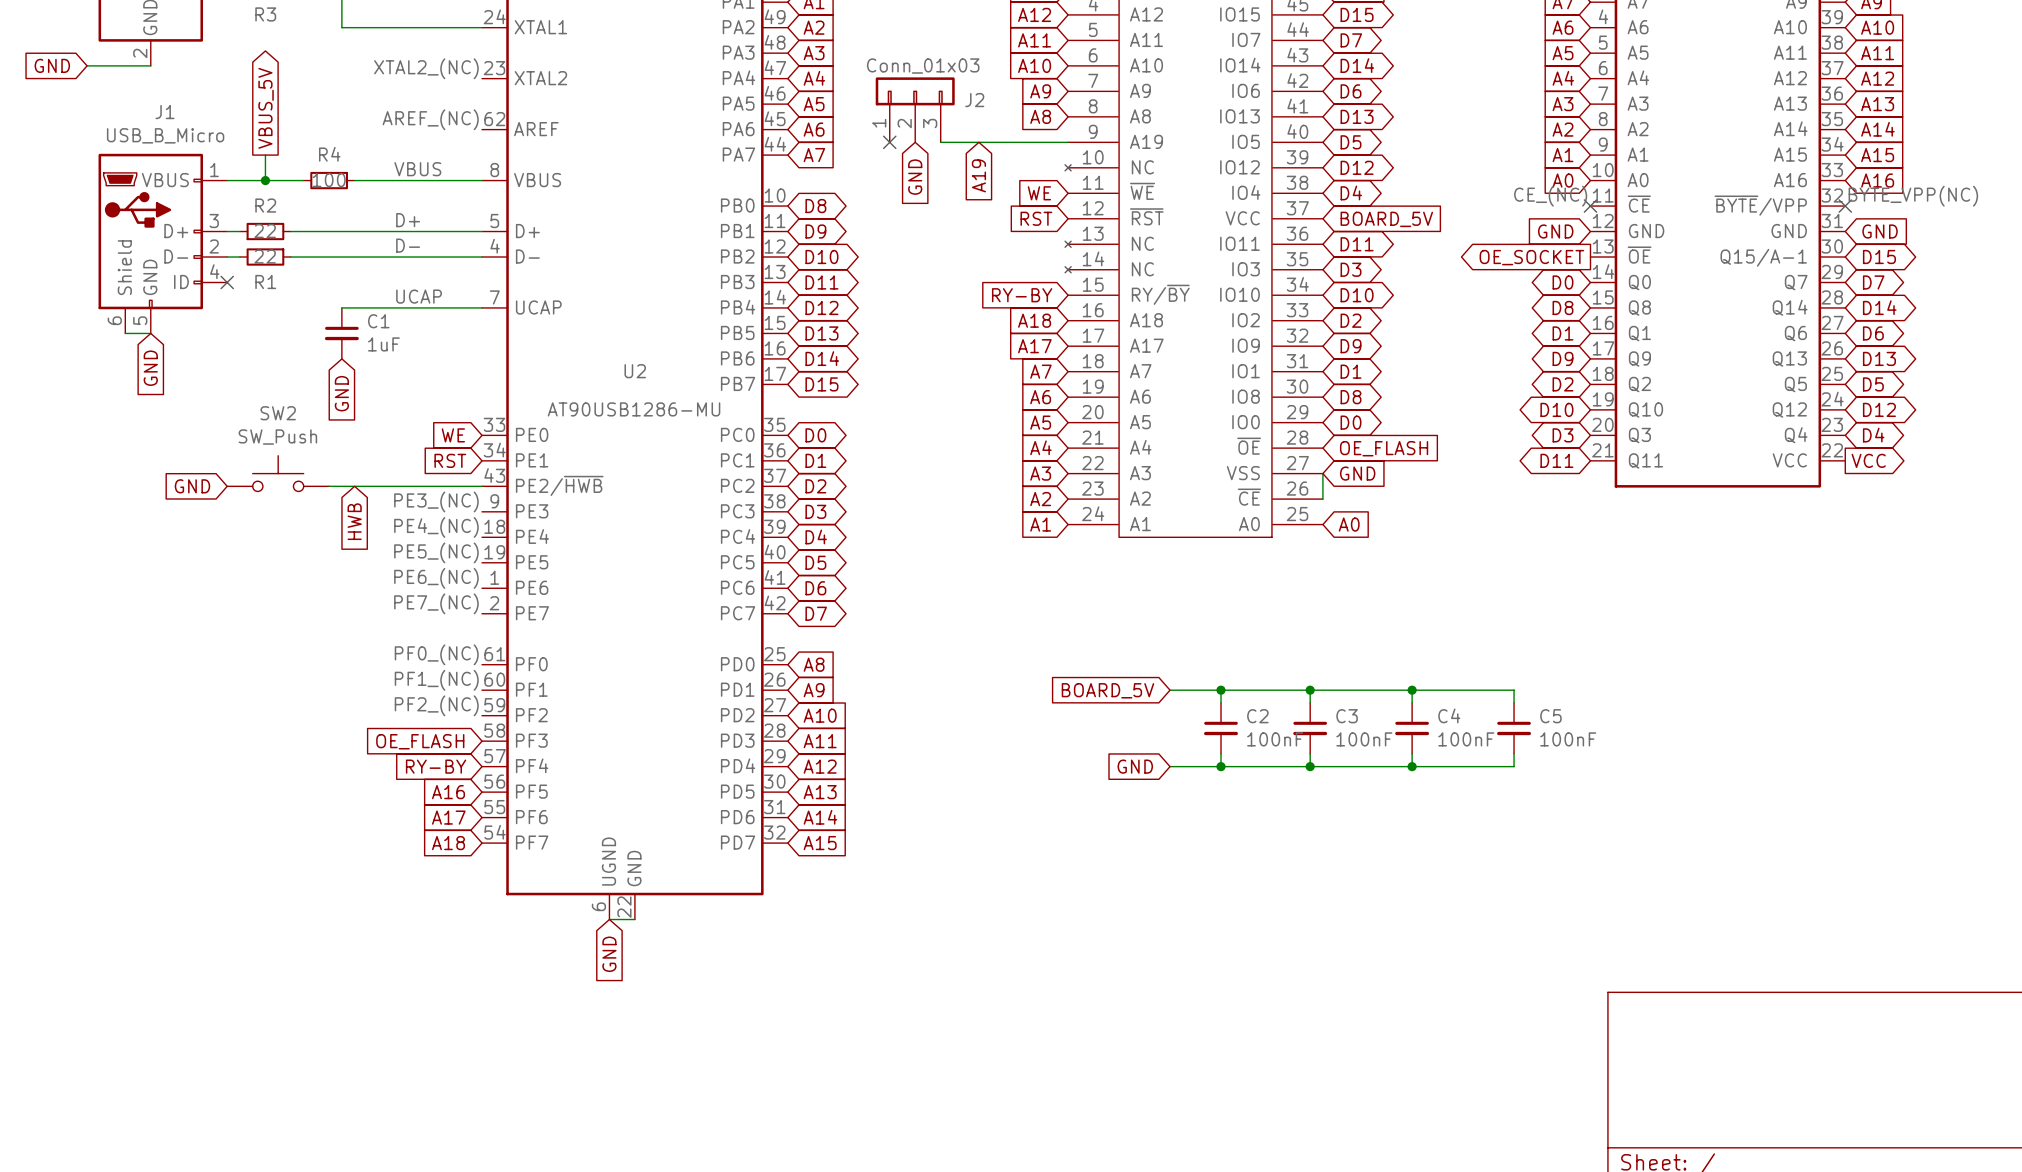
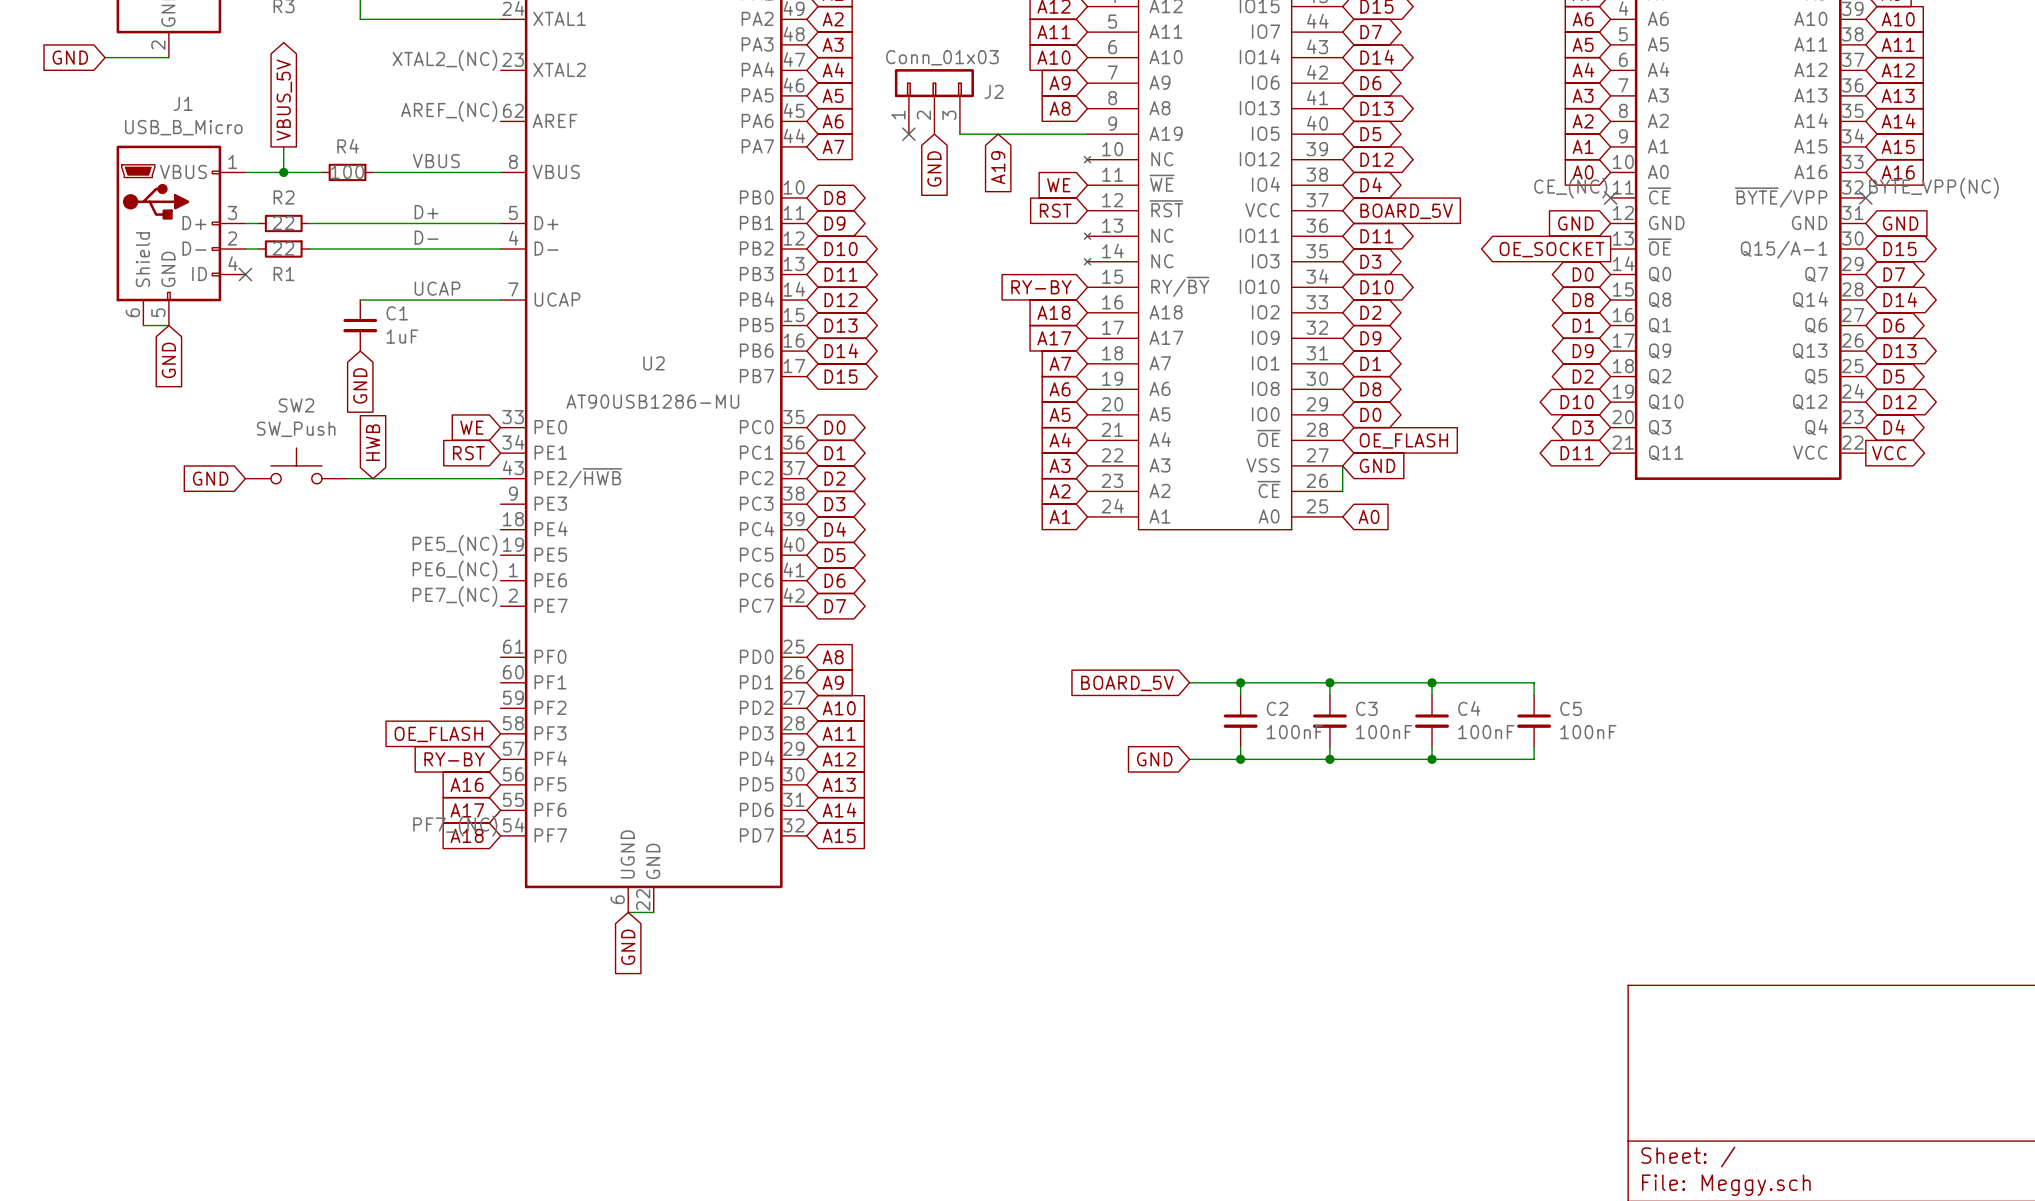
label: PE3_(NC) (436, 501) -> none
global label rotation: 0° (354, 521) -> 180° (373, 442)
global label position: HWB (354, 521) -> HWB (373, 442)
label: PE4_(NC) (436, 527) -> none
label: PF0_(NC) (436, 654) -> none
label: PF1_(NC) (436, 680) -> none
label: PF2_(NC) (436, 705) -> none
label: none -> PF7_(NC) (455, 826)

